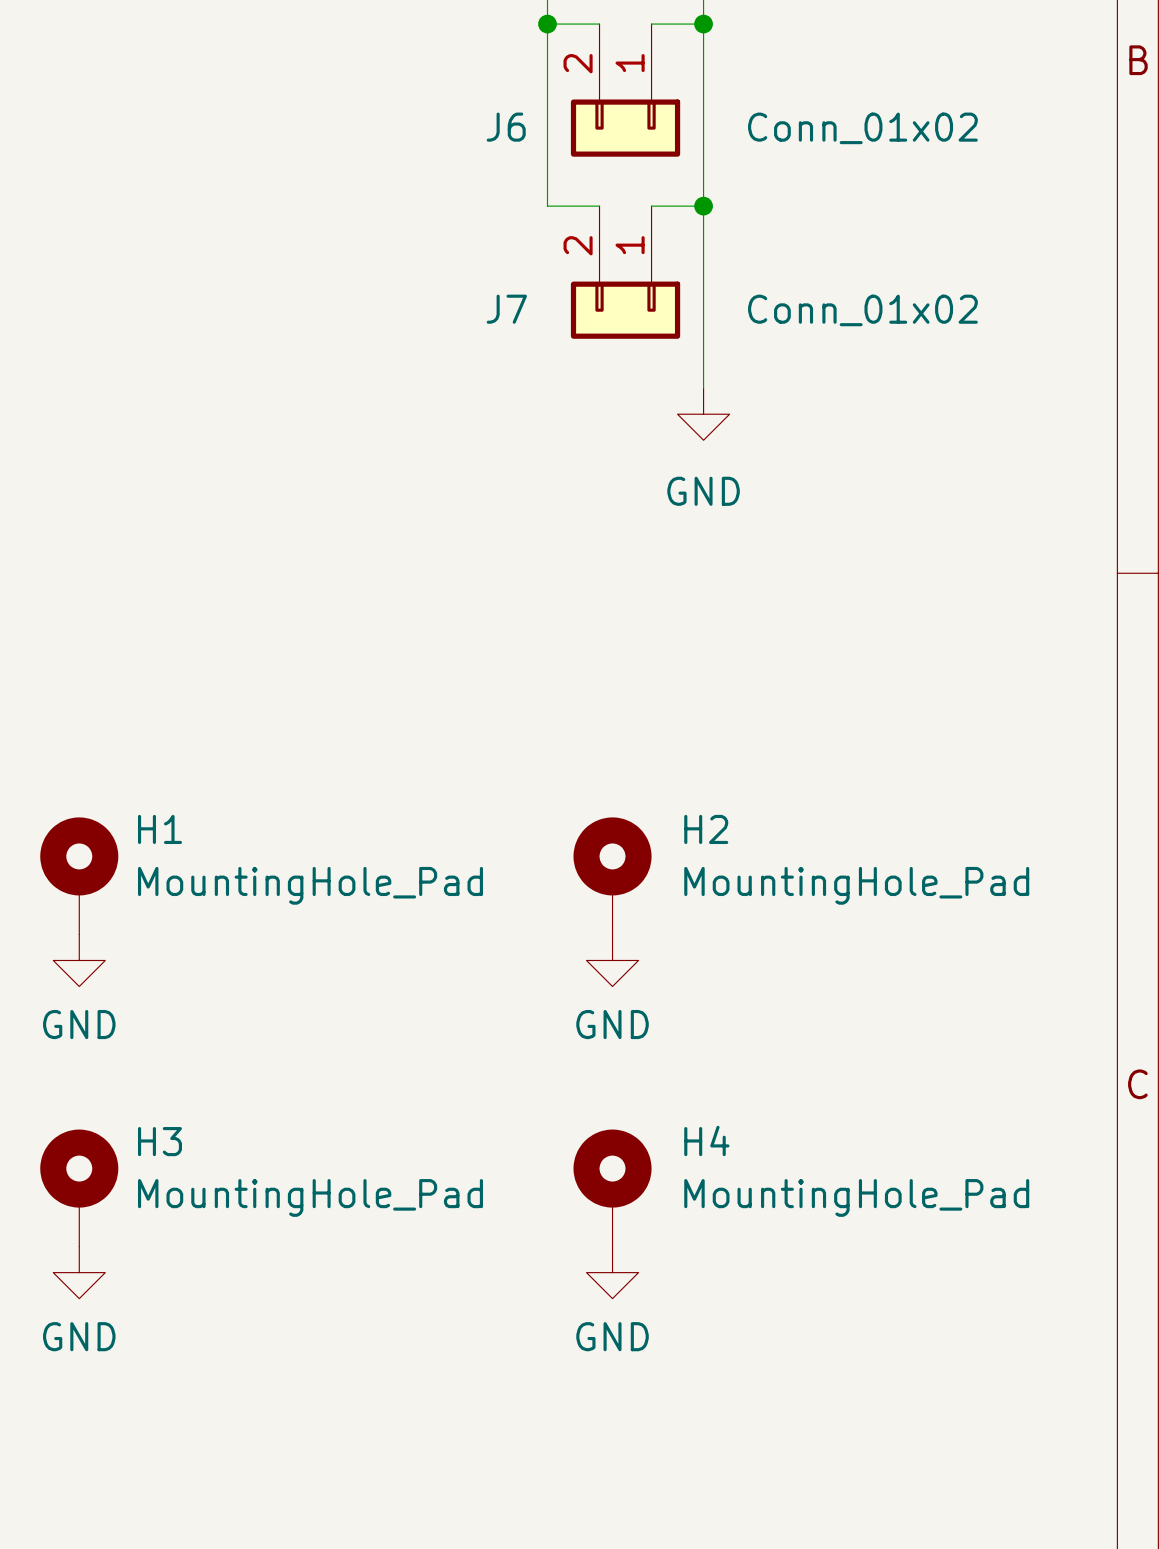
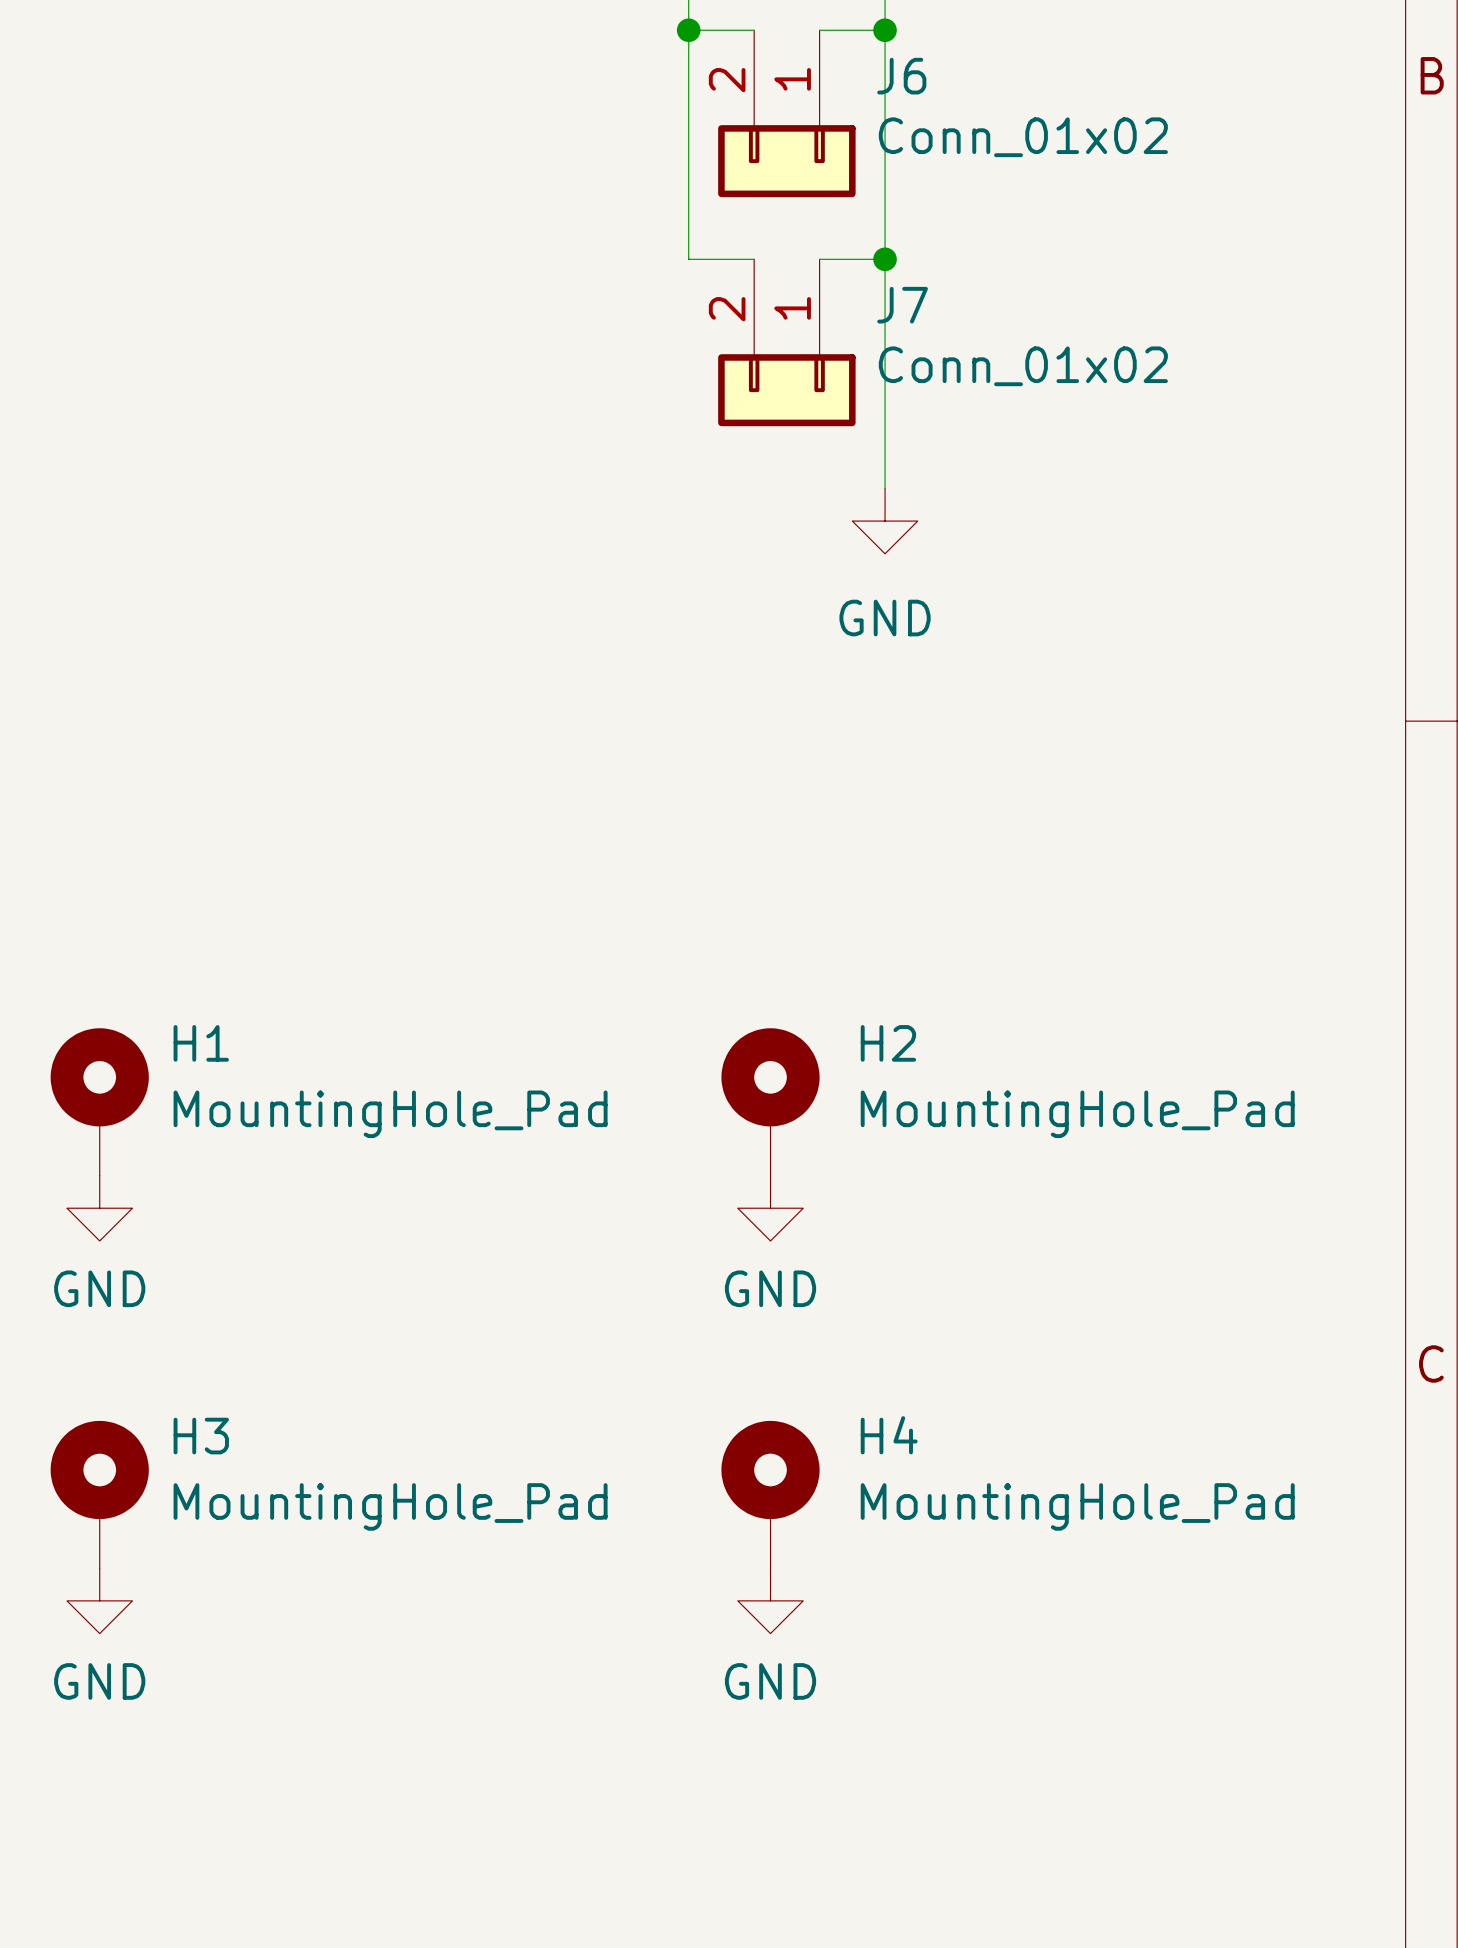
J6 name position: J6 (506, 127) -> J6 (901, 76)
J6 value position: Conn_01x02 (862, 128) -> Conn_01x02 (1023, 137)
J7 name position: J7 (506, 309) -> J7 (902, 305)
J7 value position: Conn_01x02 (862, 310) -> Conn_01x02 (1023, 366)

